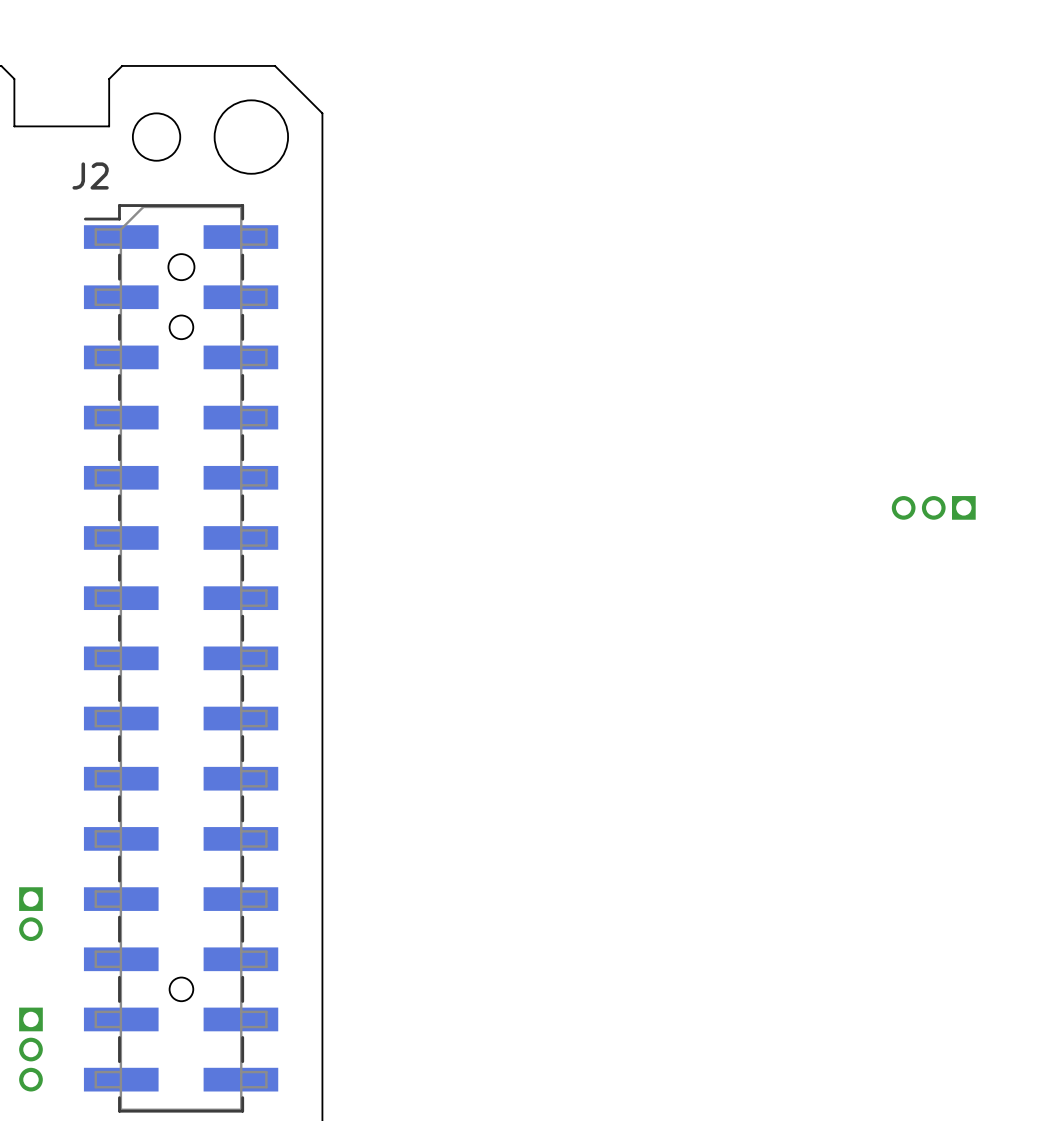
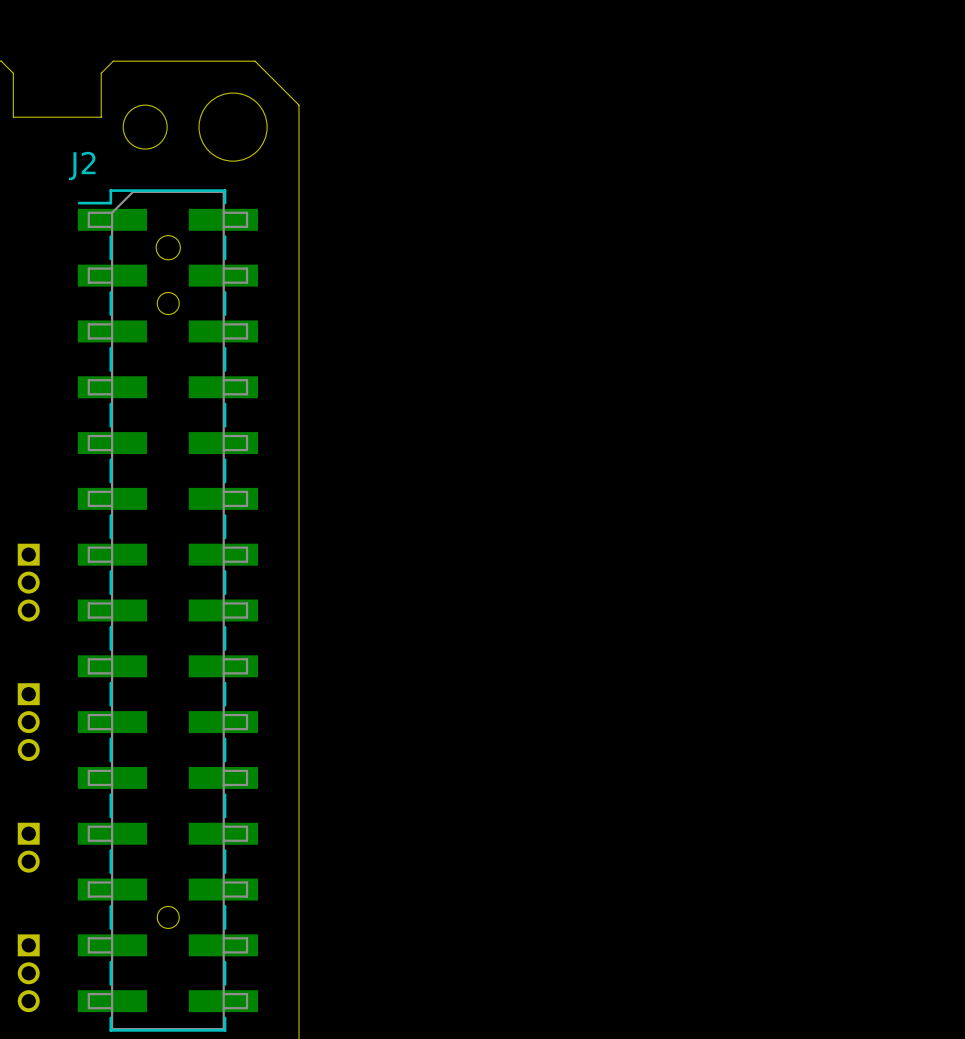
part: (933, 507) -> none
part: none -> (28, 582)
part: none -> (28, 722)

